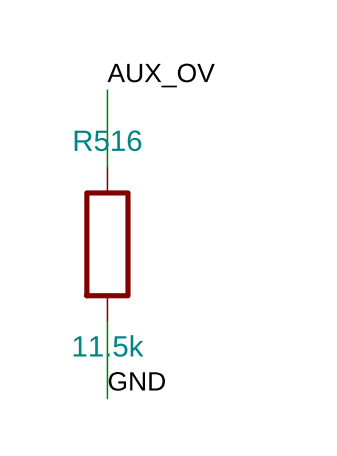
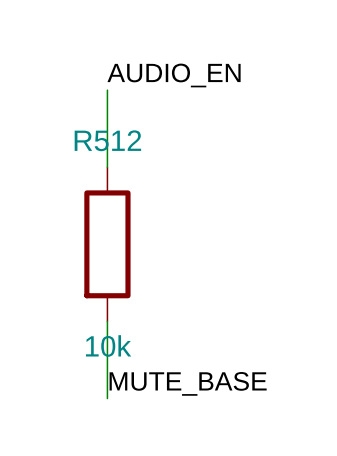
label: AUX_OV (161, 75) -> AUDIO_EN (174, 75)
R516 name: R516 (107, 140) -> R512 (107, 140)
R516 value: 11.5k (108, 345) -> 10k (108, 345)
label: GND (136, 381) -> MUTE_BASE (188, 383)

